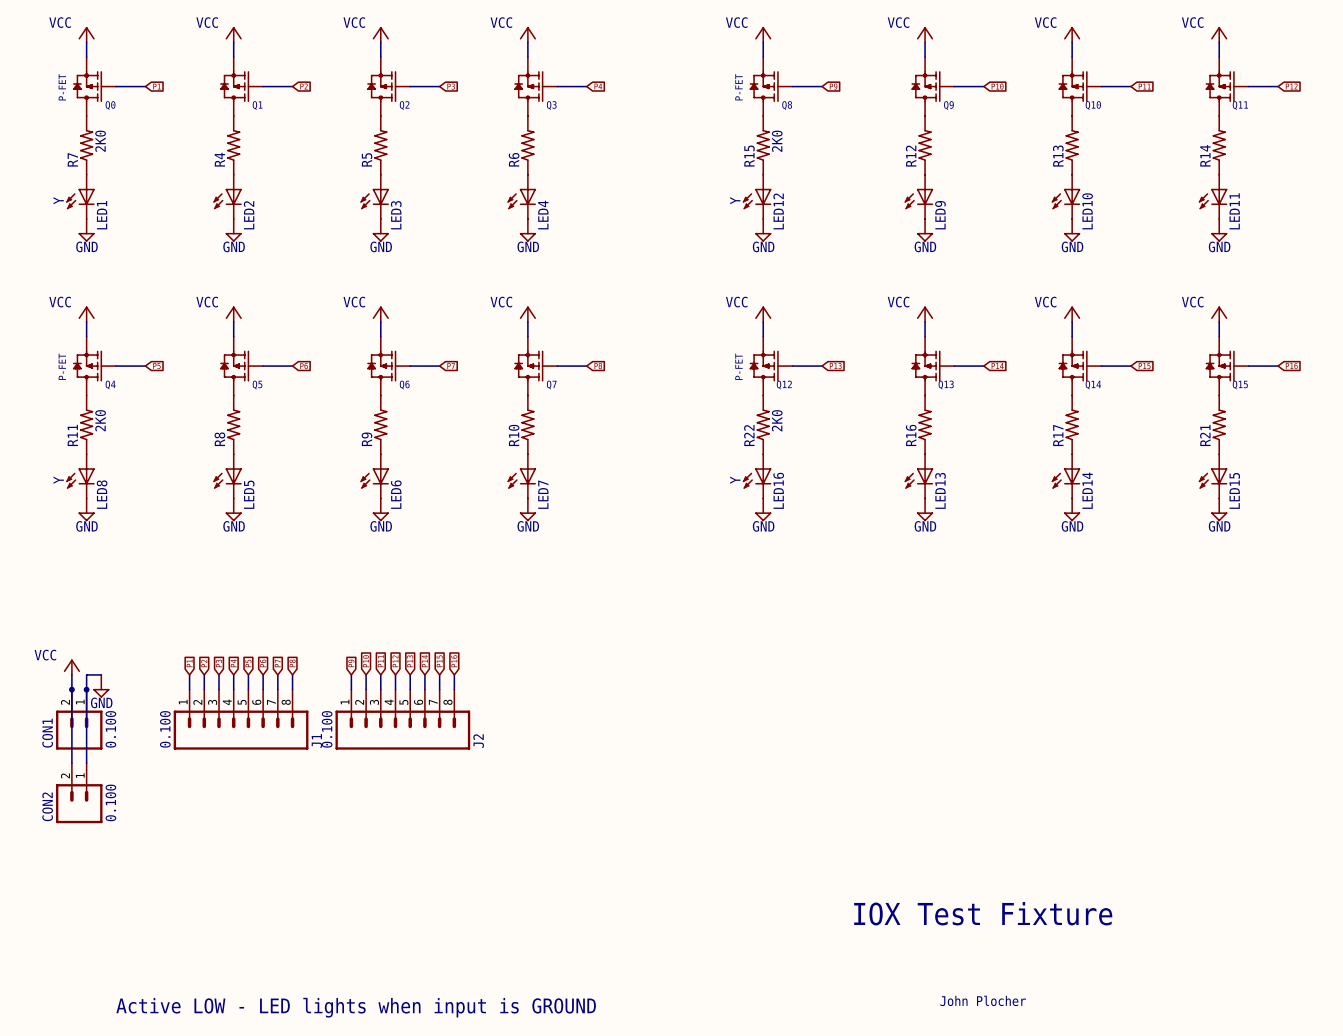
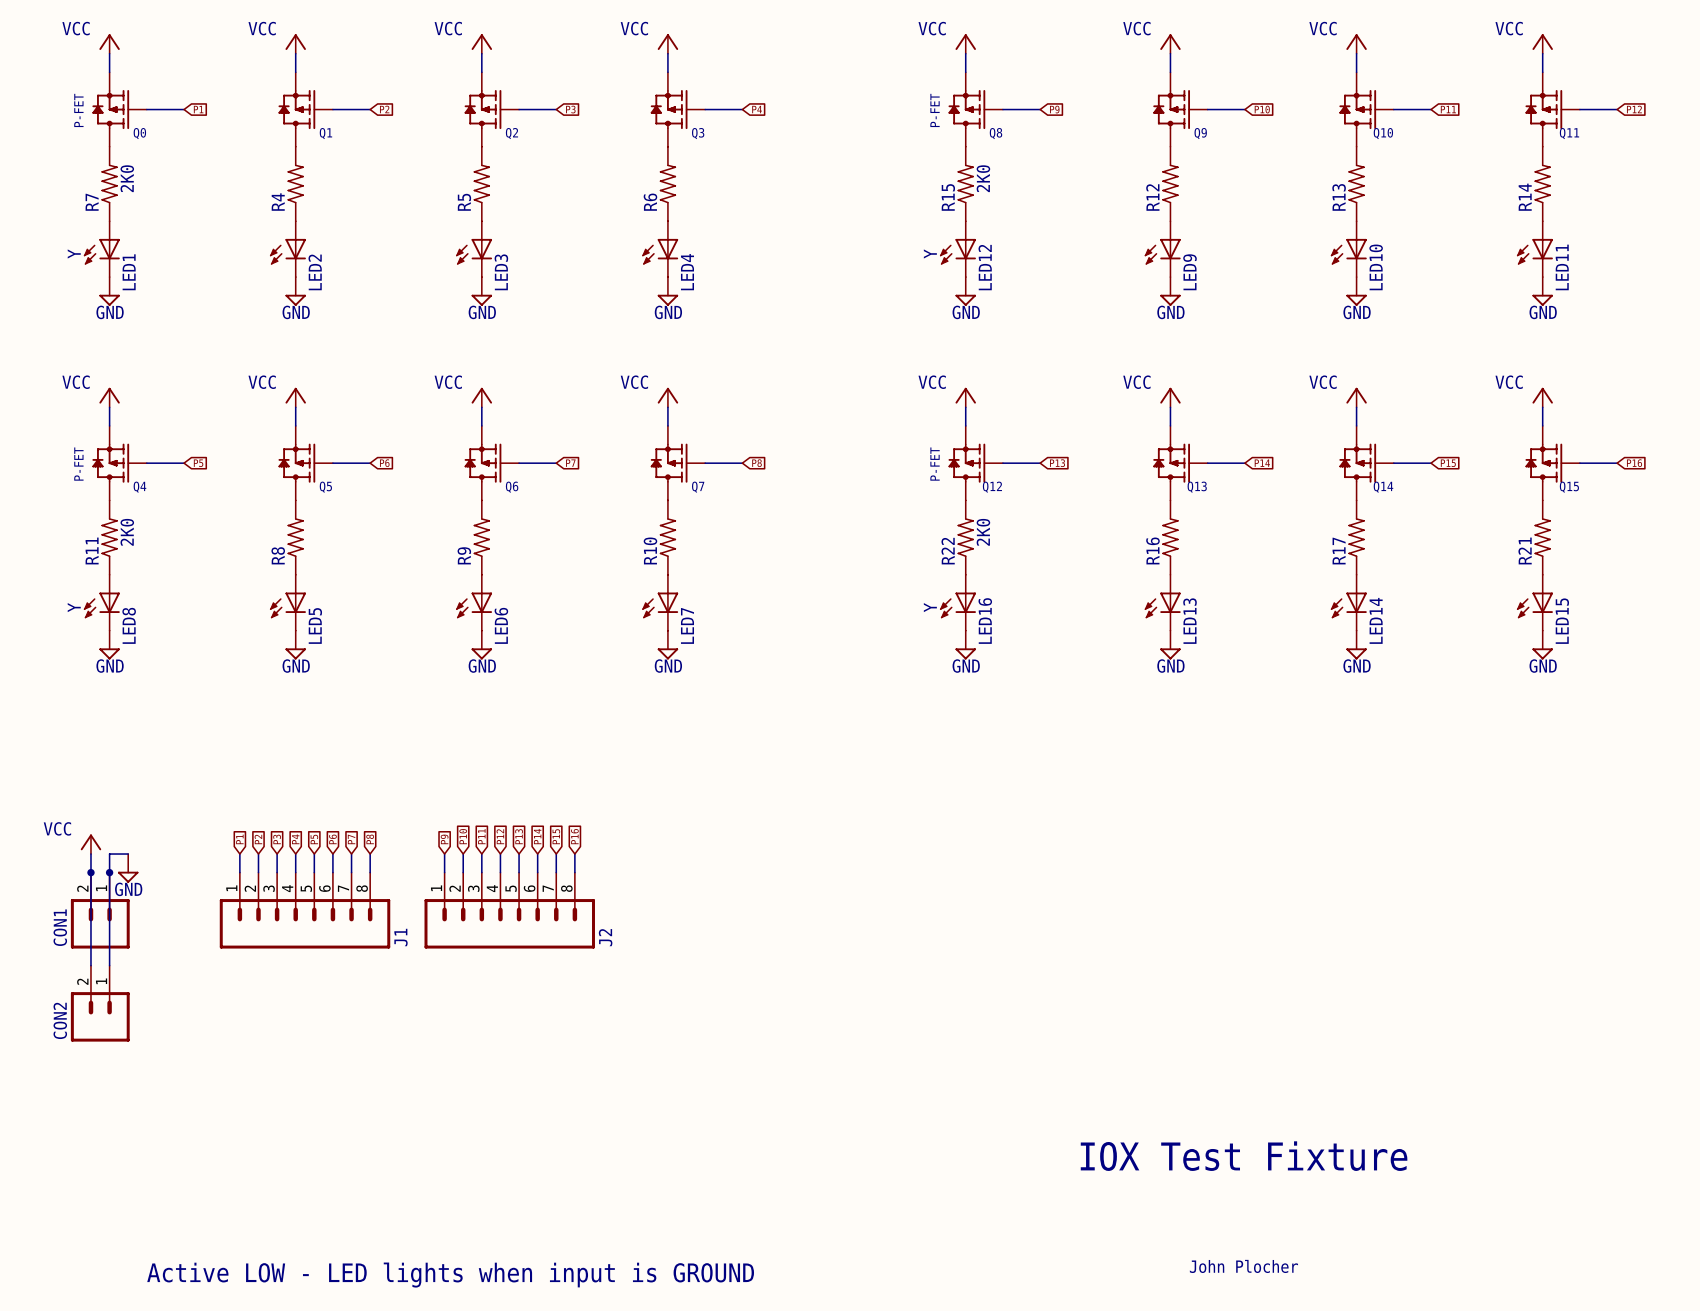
CON1 value: 0.100 (110, 729) -> none
J1 value: 0.100 (165, 729) -> none
J2 value: 0.100 (327, 729) -> none
CON2 value: 0.100 (110, 802) -> none

